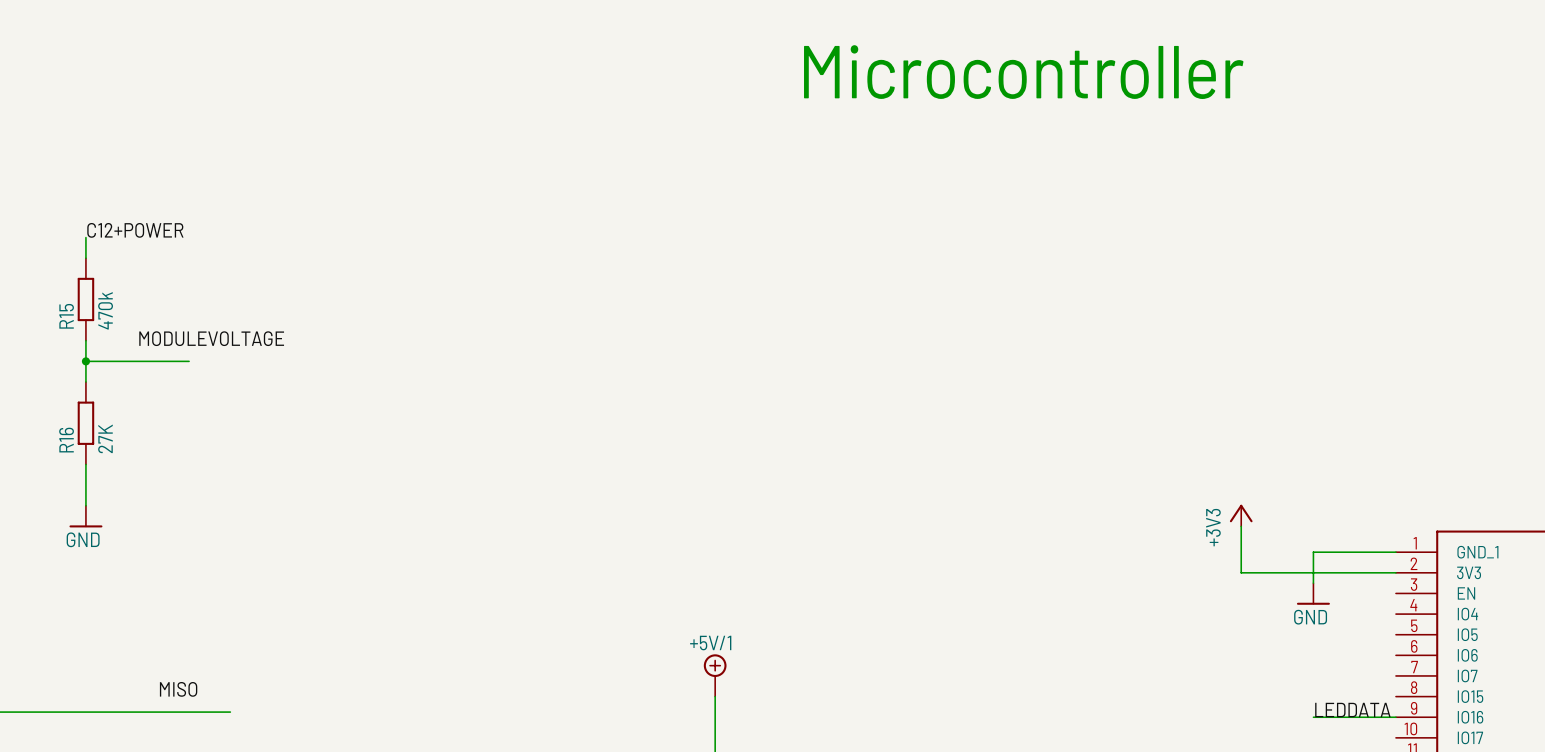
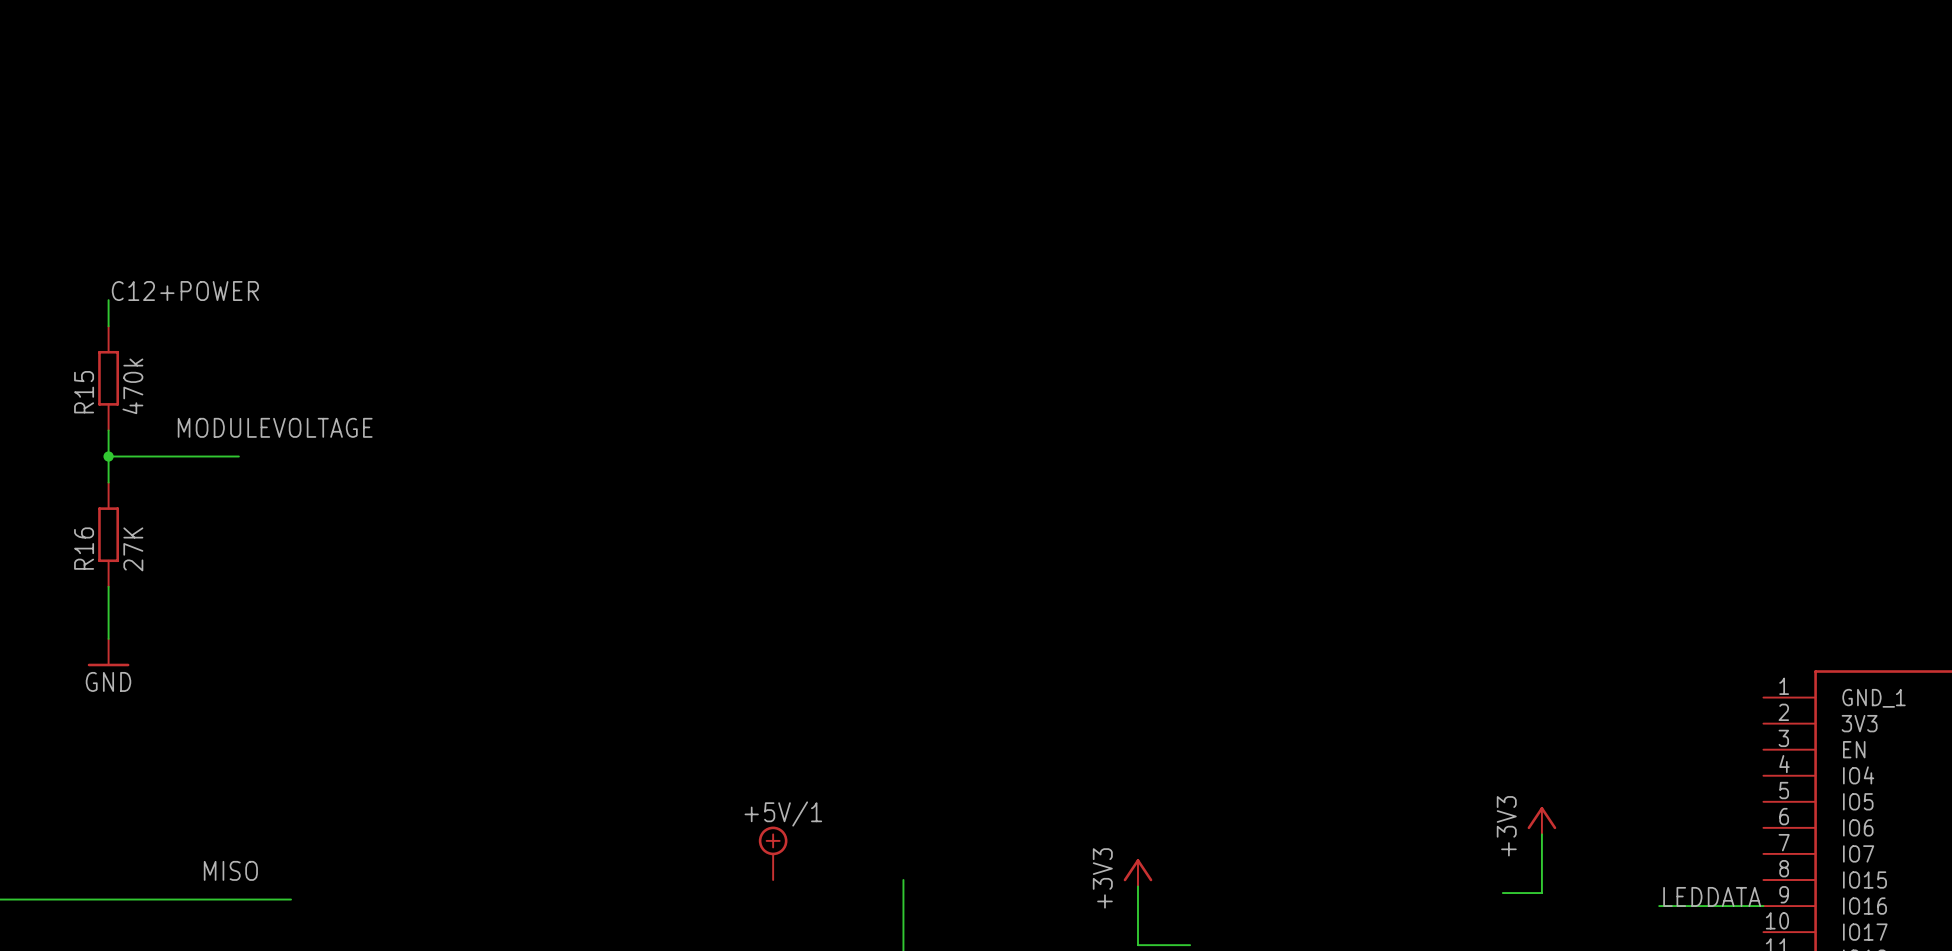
text: Microcontroller (1023, 72) -> none
power symbol position: +3V3 (1241, 515) -> +3V3 (1541, 820)
wire: (1241, 526) (1241, 572) (1395, 572) -> none
wire: (1395, 552) (1313, 552) (1313, 583) -> none
power symbol: GND (1313, 593) -> none
wire: none -> (1541, 834) (1541, 893) (1502, 893)
power symbol position: +5V/1 (715, 675) -> +5V/1 (773, 853)
power symbol: none -> +3V3 (1137, 872)
wire: none -> (1137, 886) (1137, 945) (1190, 945)

